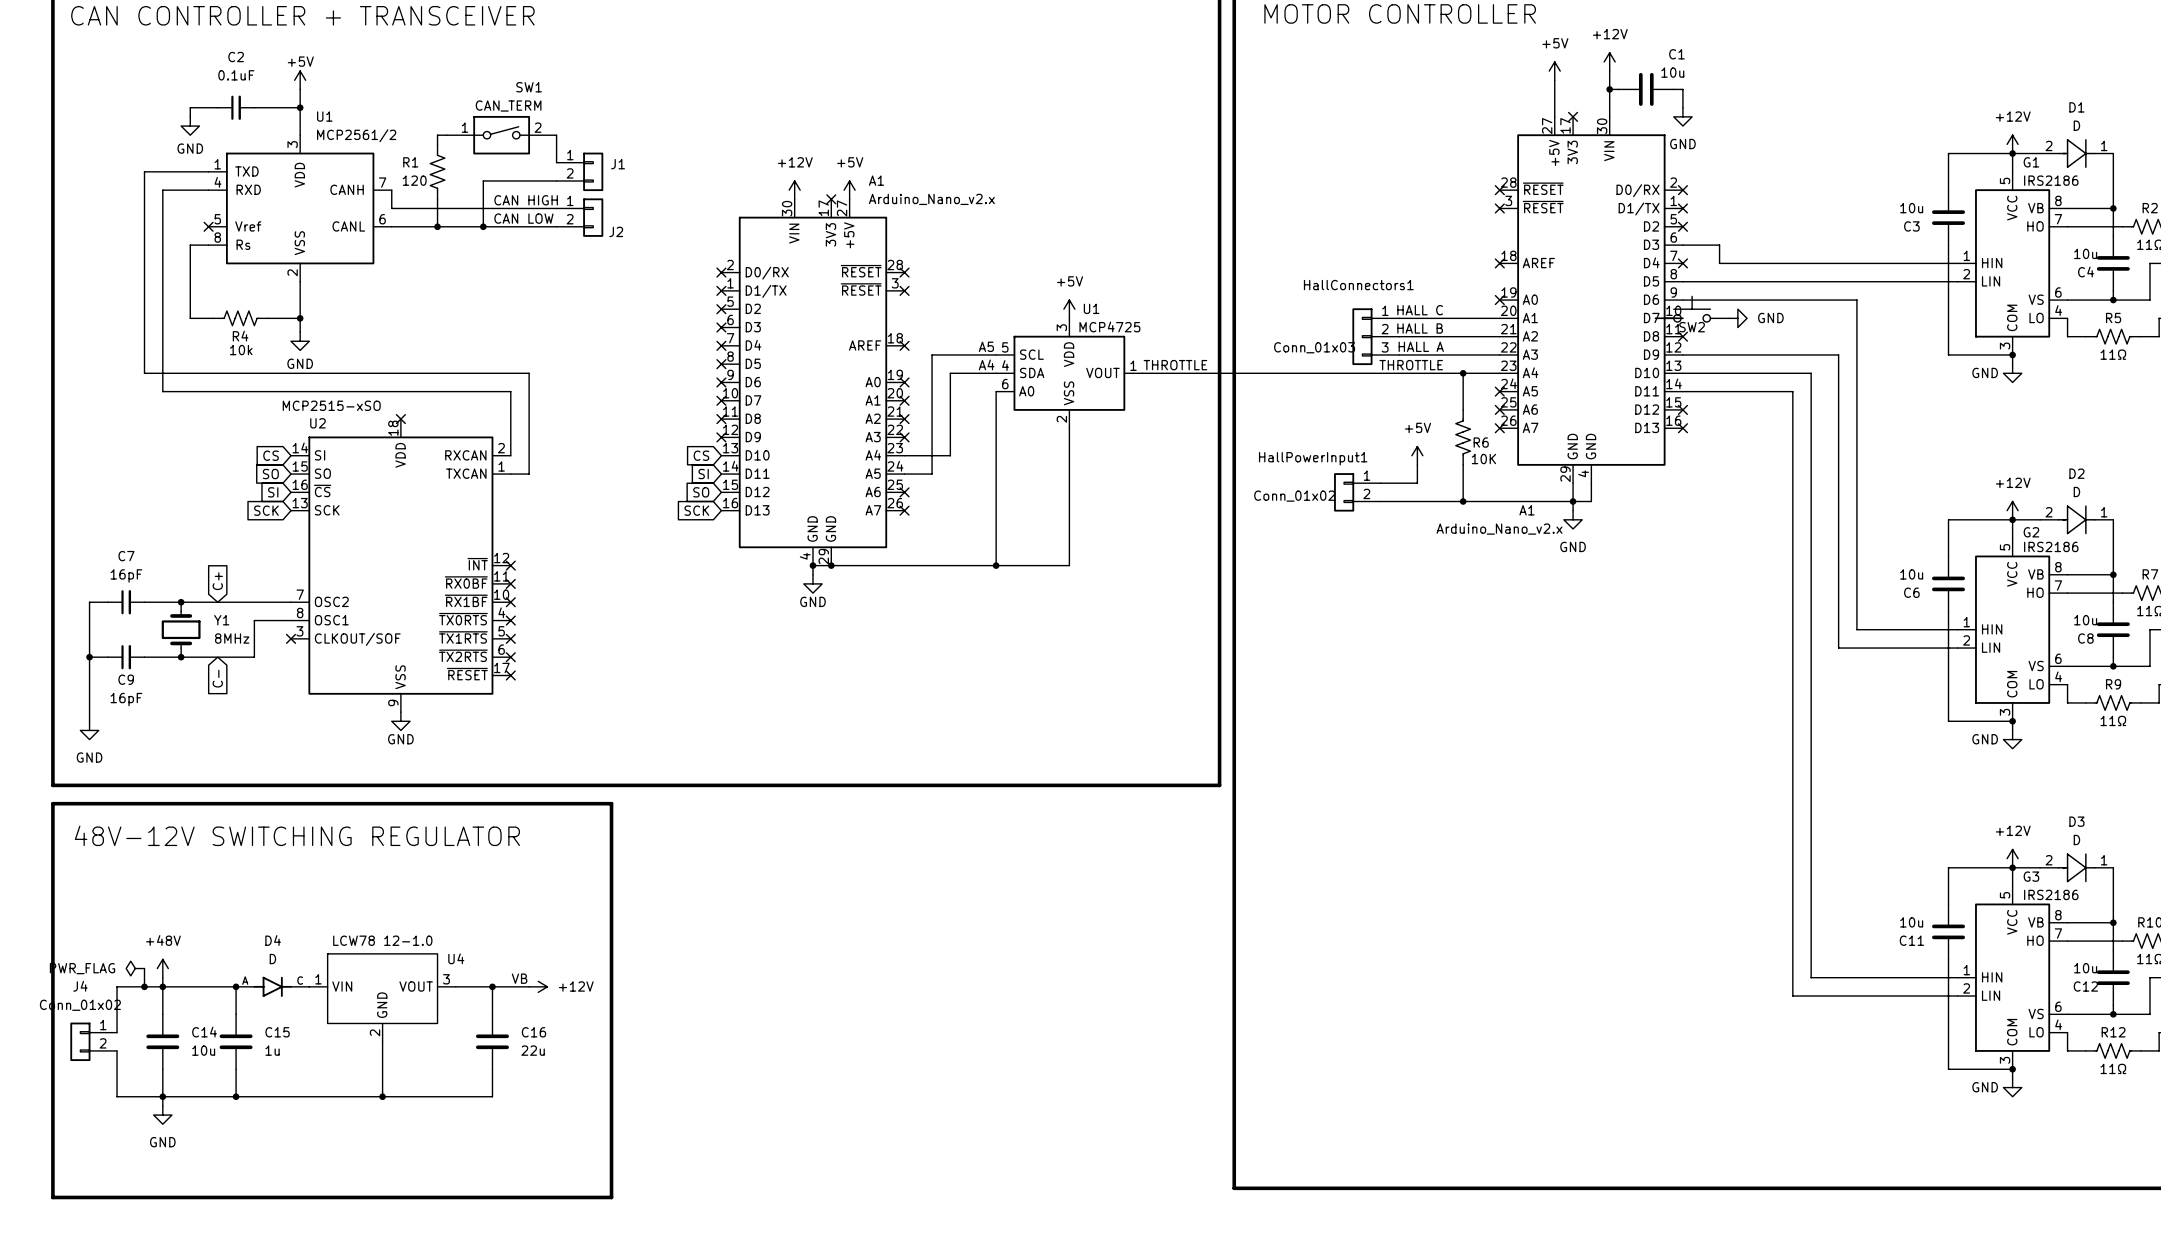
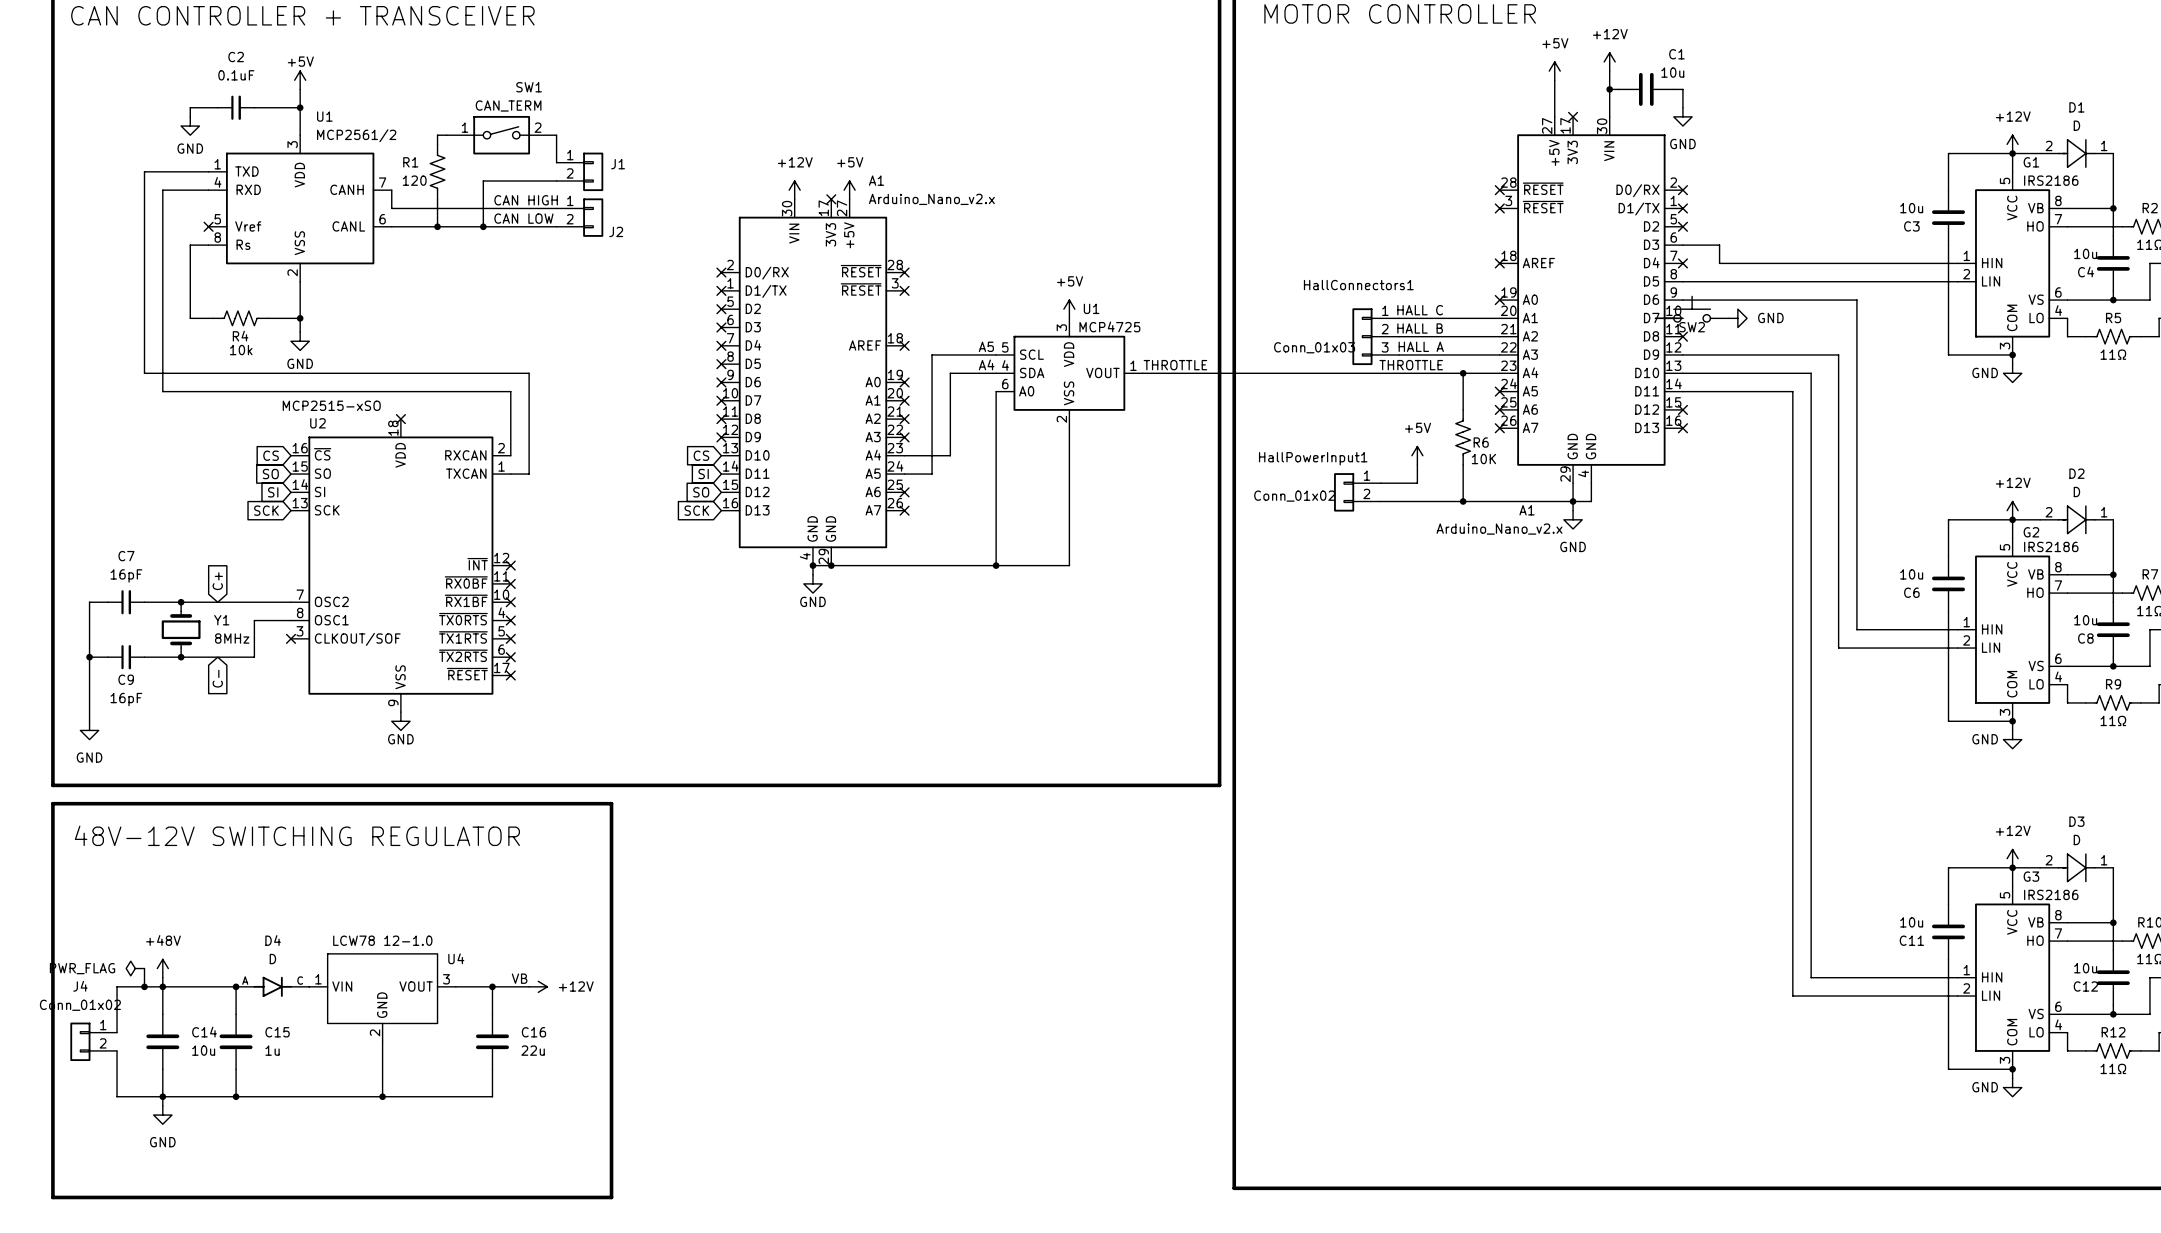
U2 pin number: 14 (300, 447) -> 16 (300, 448)
U2 pin name: SI (320, 455) -> ~{CS} (322, 454)
U2 pin number: 16 (300, 484) -> 14 (300, 484)
U2 pin name: ~{CS} (322, 490) -> SI (320, 492)

